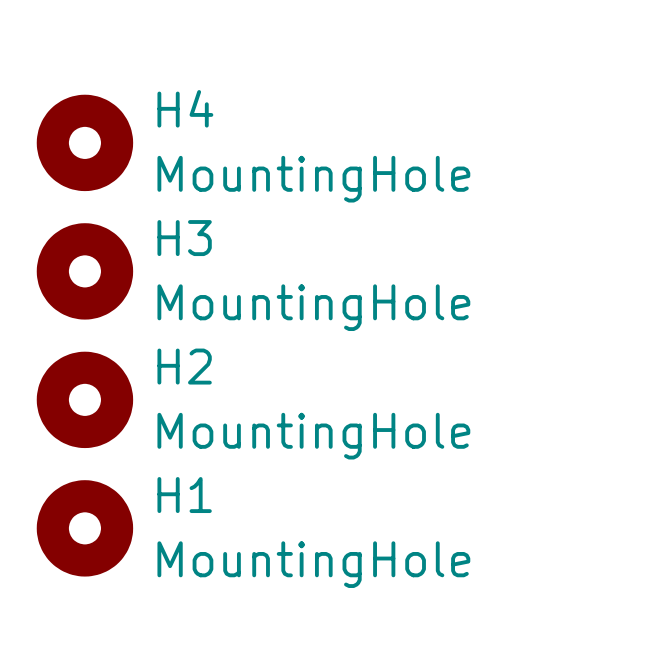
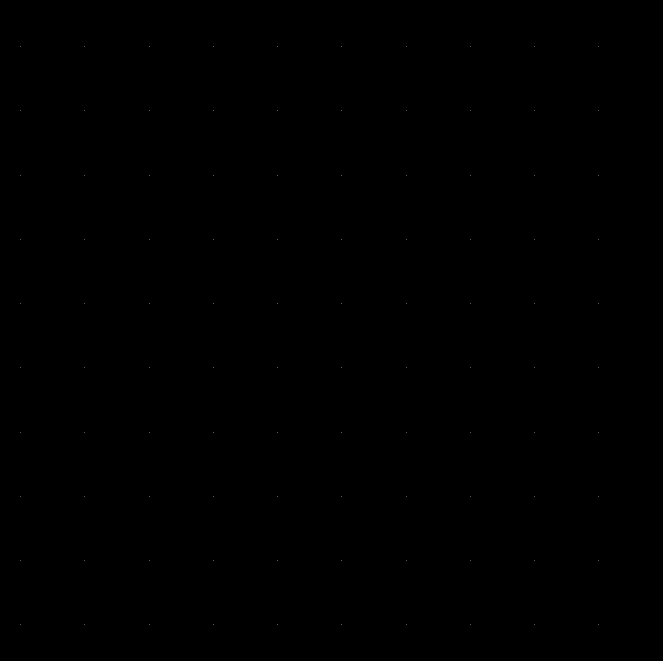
H4: MountingHole (84, 142) -> none
H3: MountingHole (84, 271) -> none
H2: MountingHole (84, 399) -> none
H1: MountingHole (84, 528) -> none

